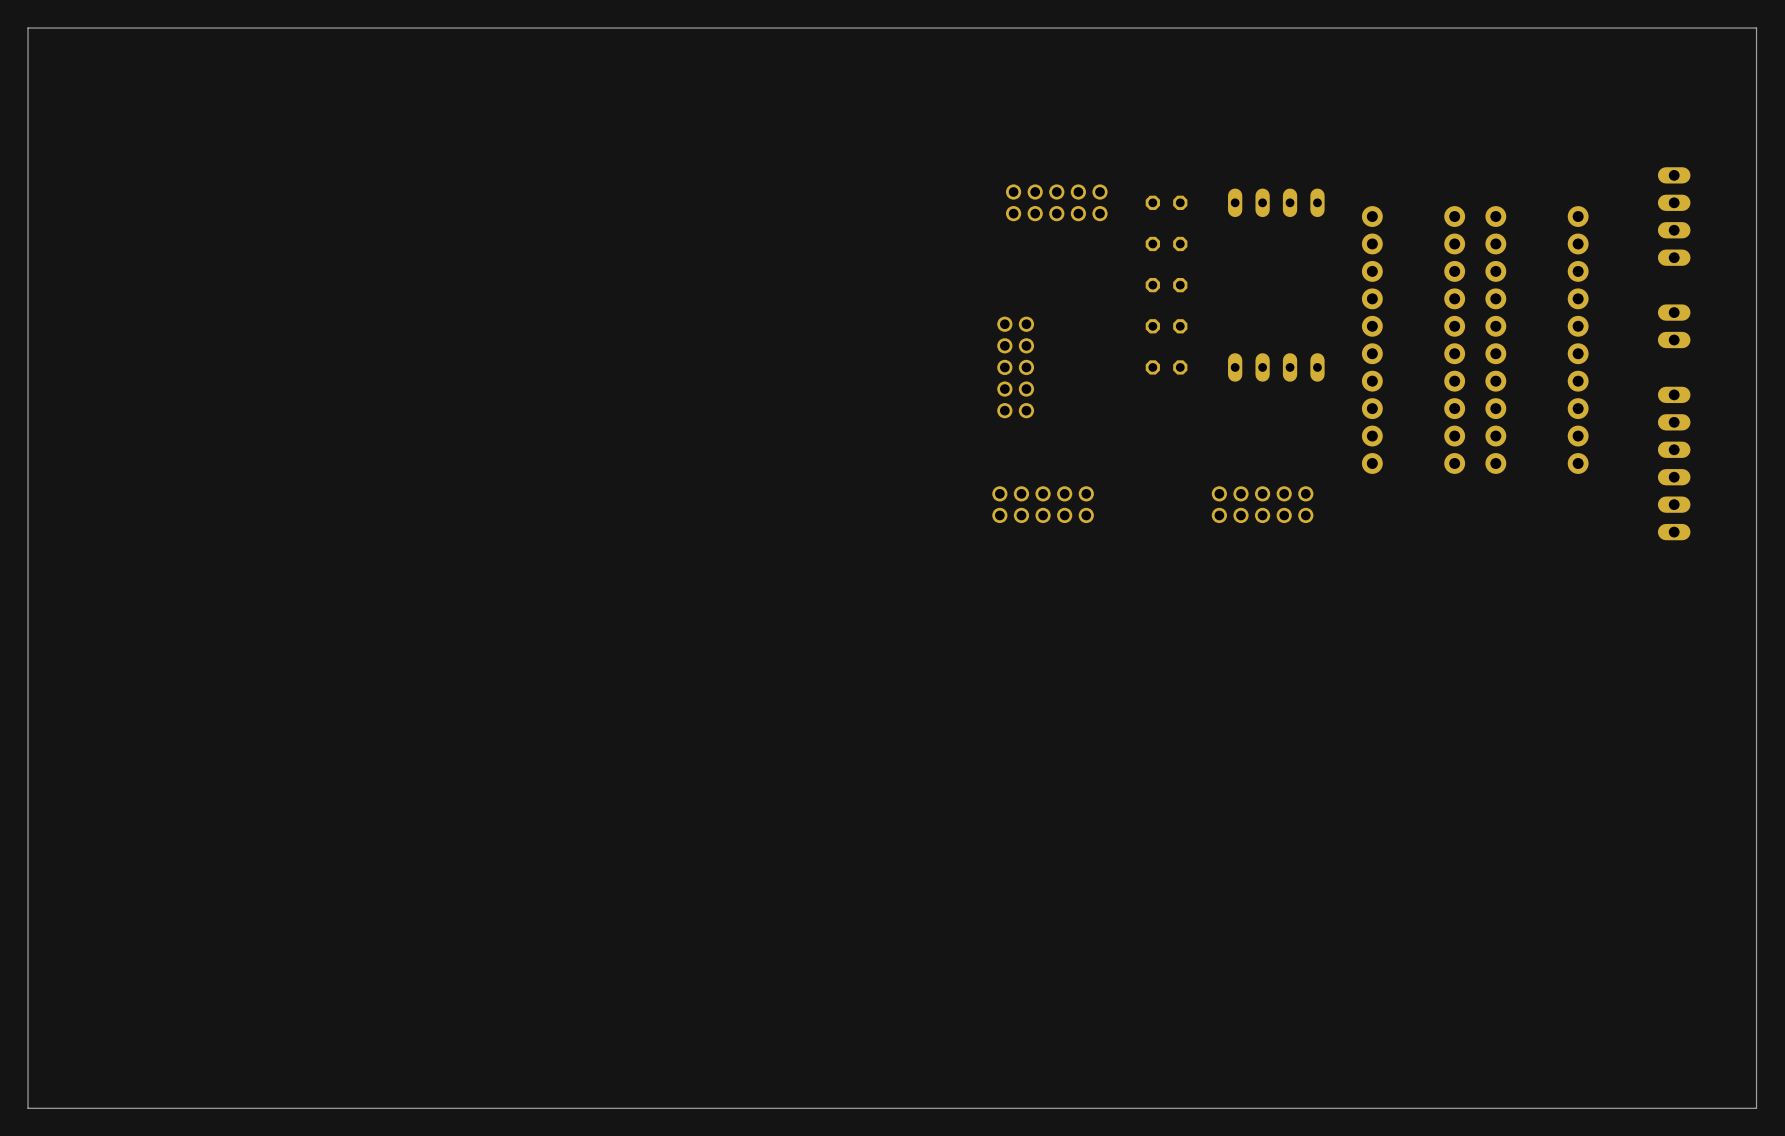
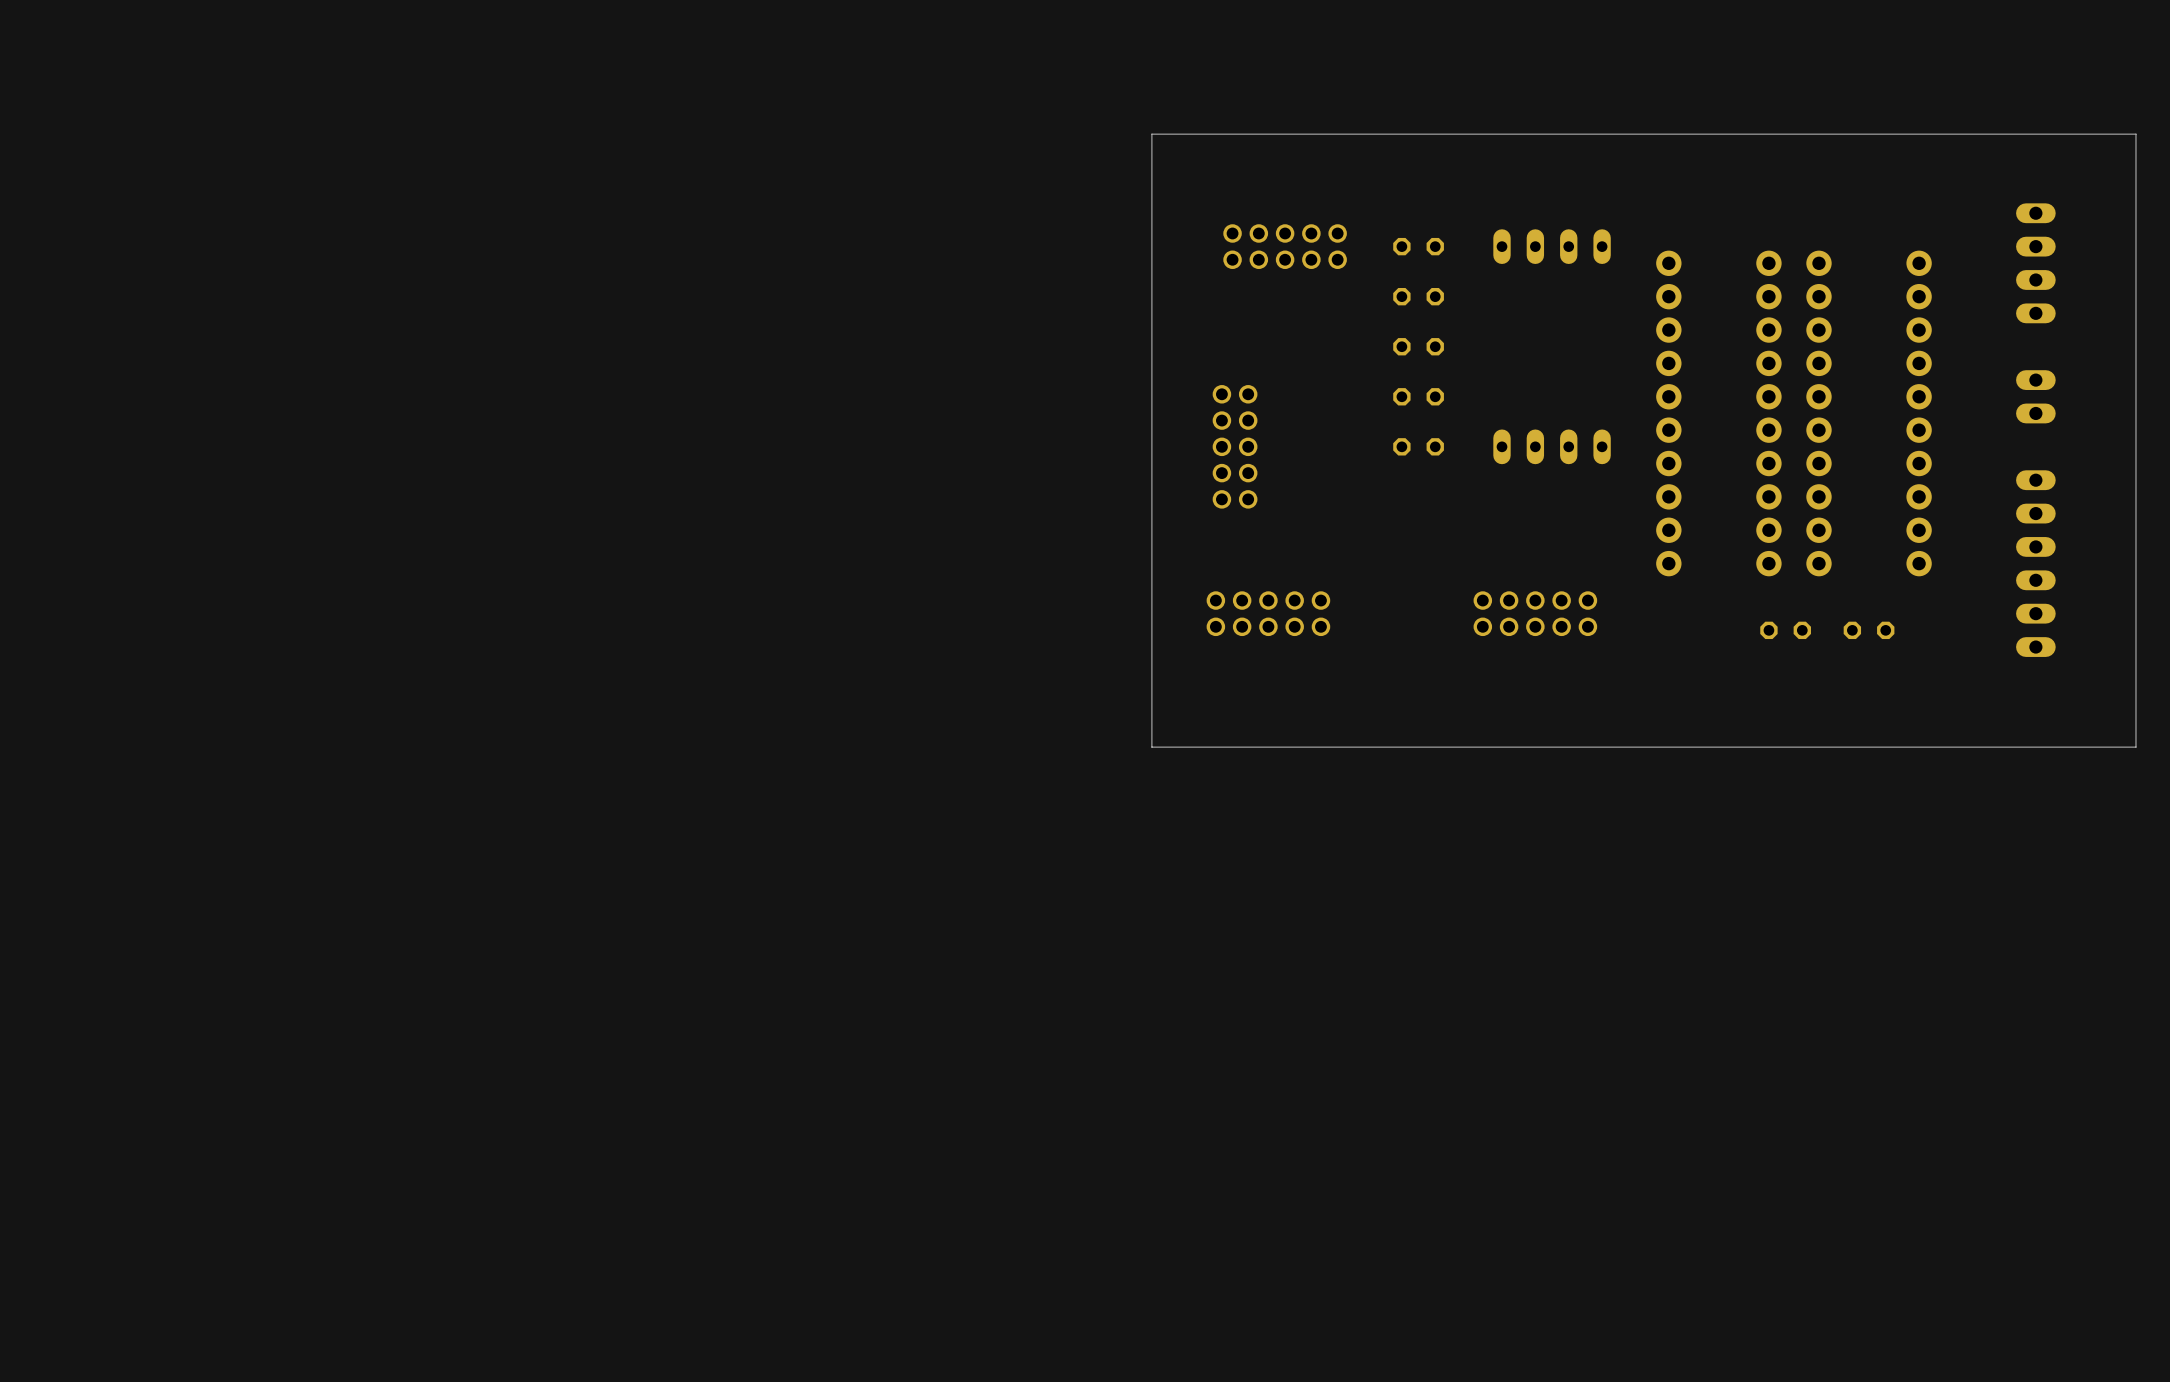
board edge: (1756, 110) (1756, 28) (28, 28) (28, 1108) (1756, 1108) (1756, 614) -> (2135, 134) (1151, 134) (1151, 747) (2135, 747)
part: none -> (1785, 630)
part: none -> (1869, 630)

